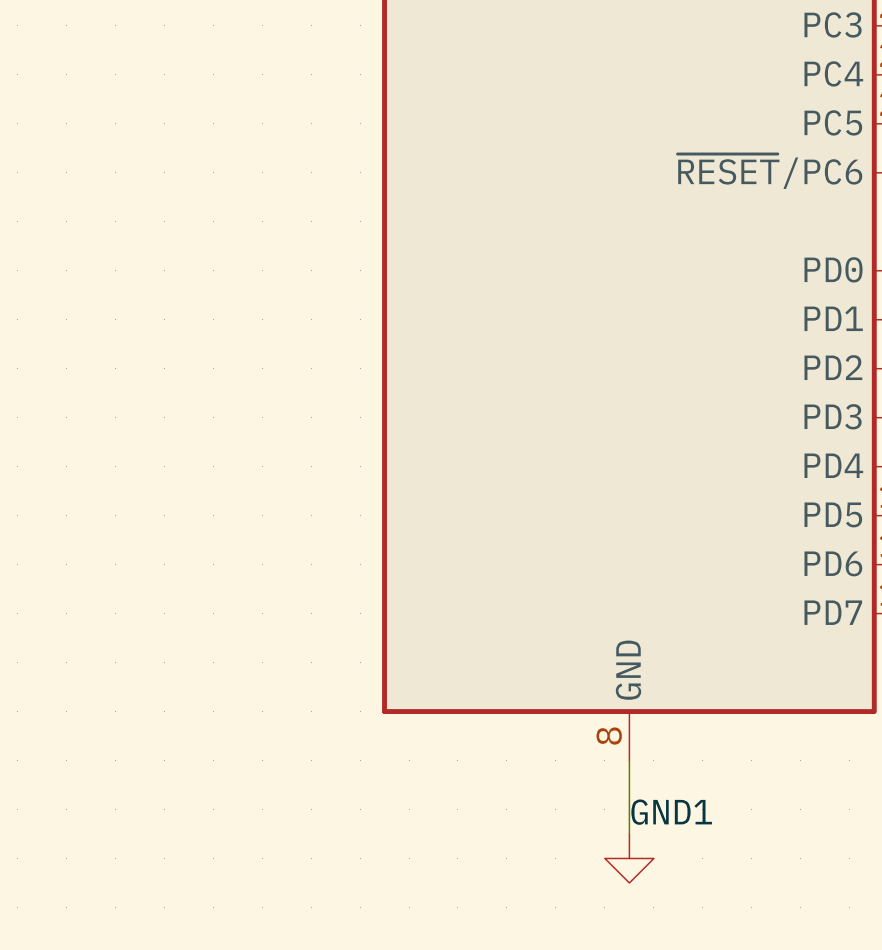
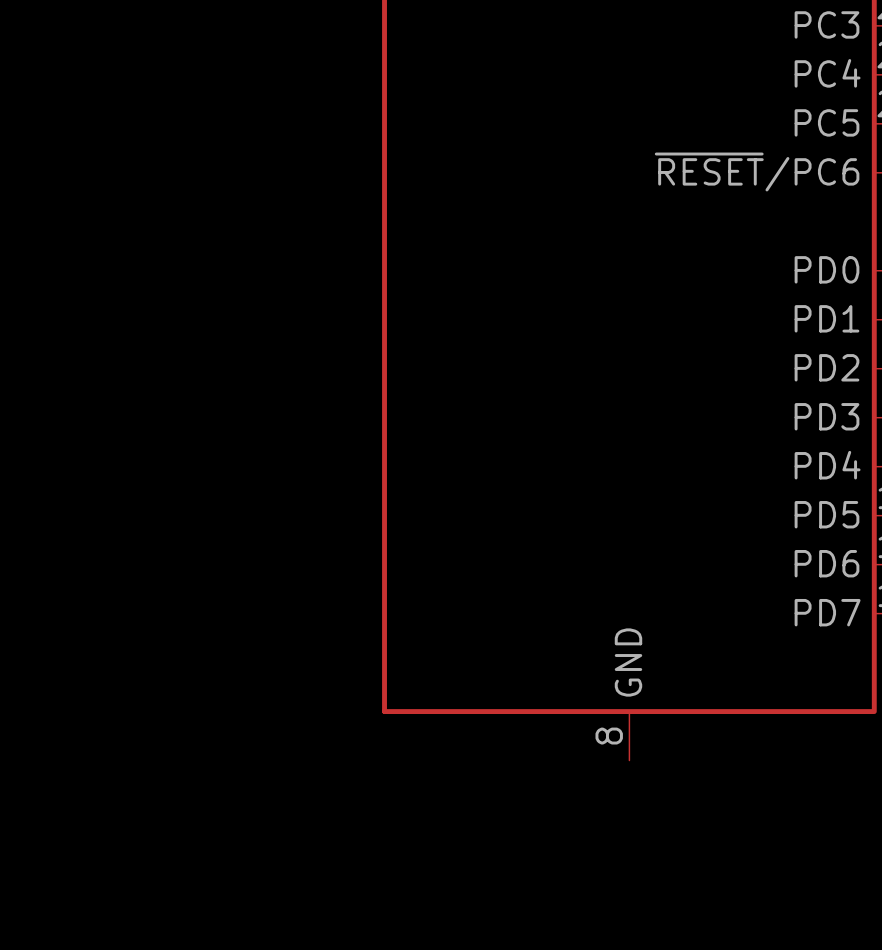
wire: (629, 760) (629, 834) -> none
label: GND1 (671, 812) -> none
power symbol: (629, 858) -> none

